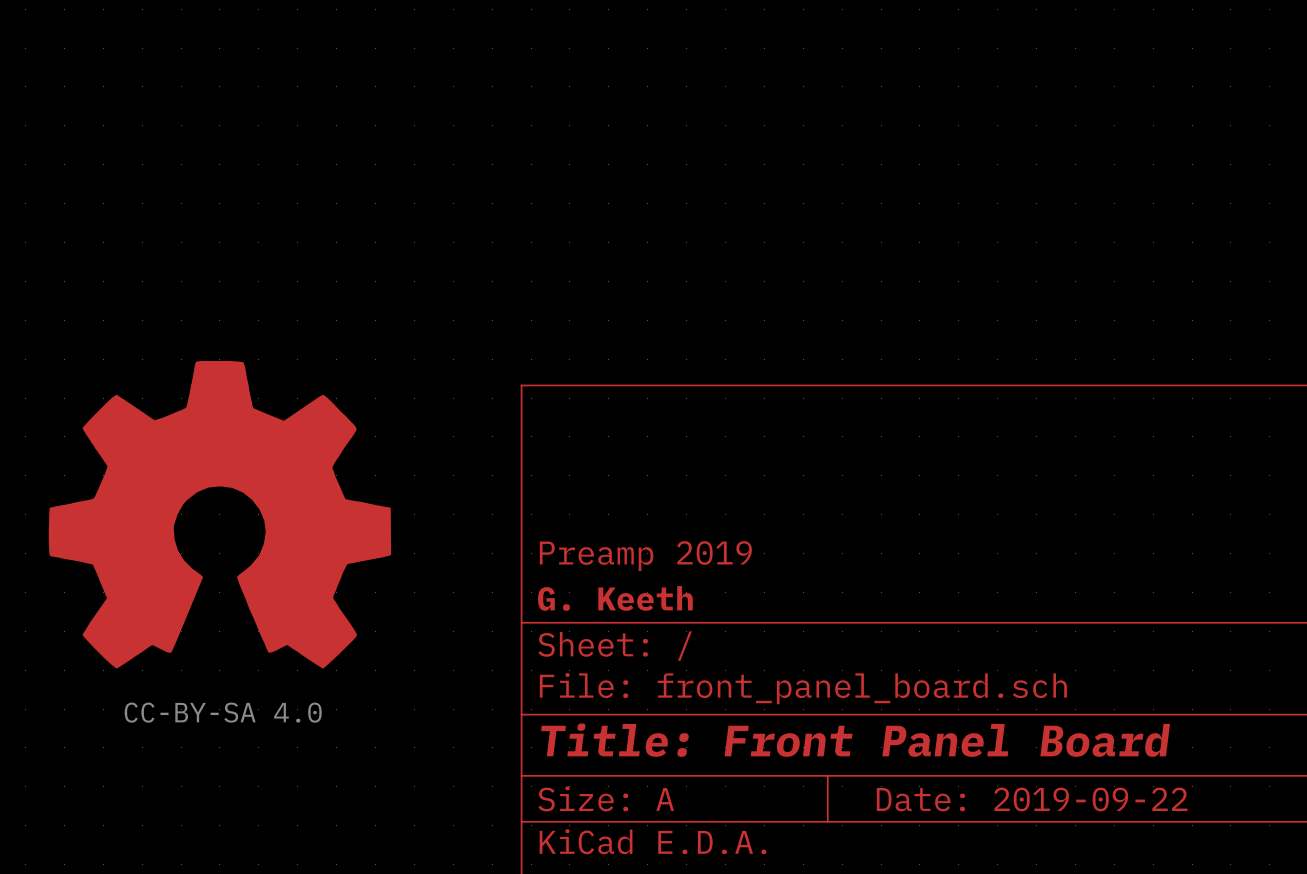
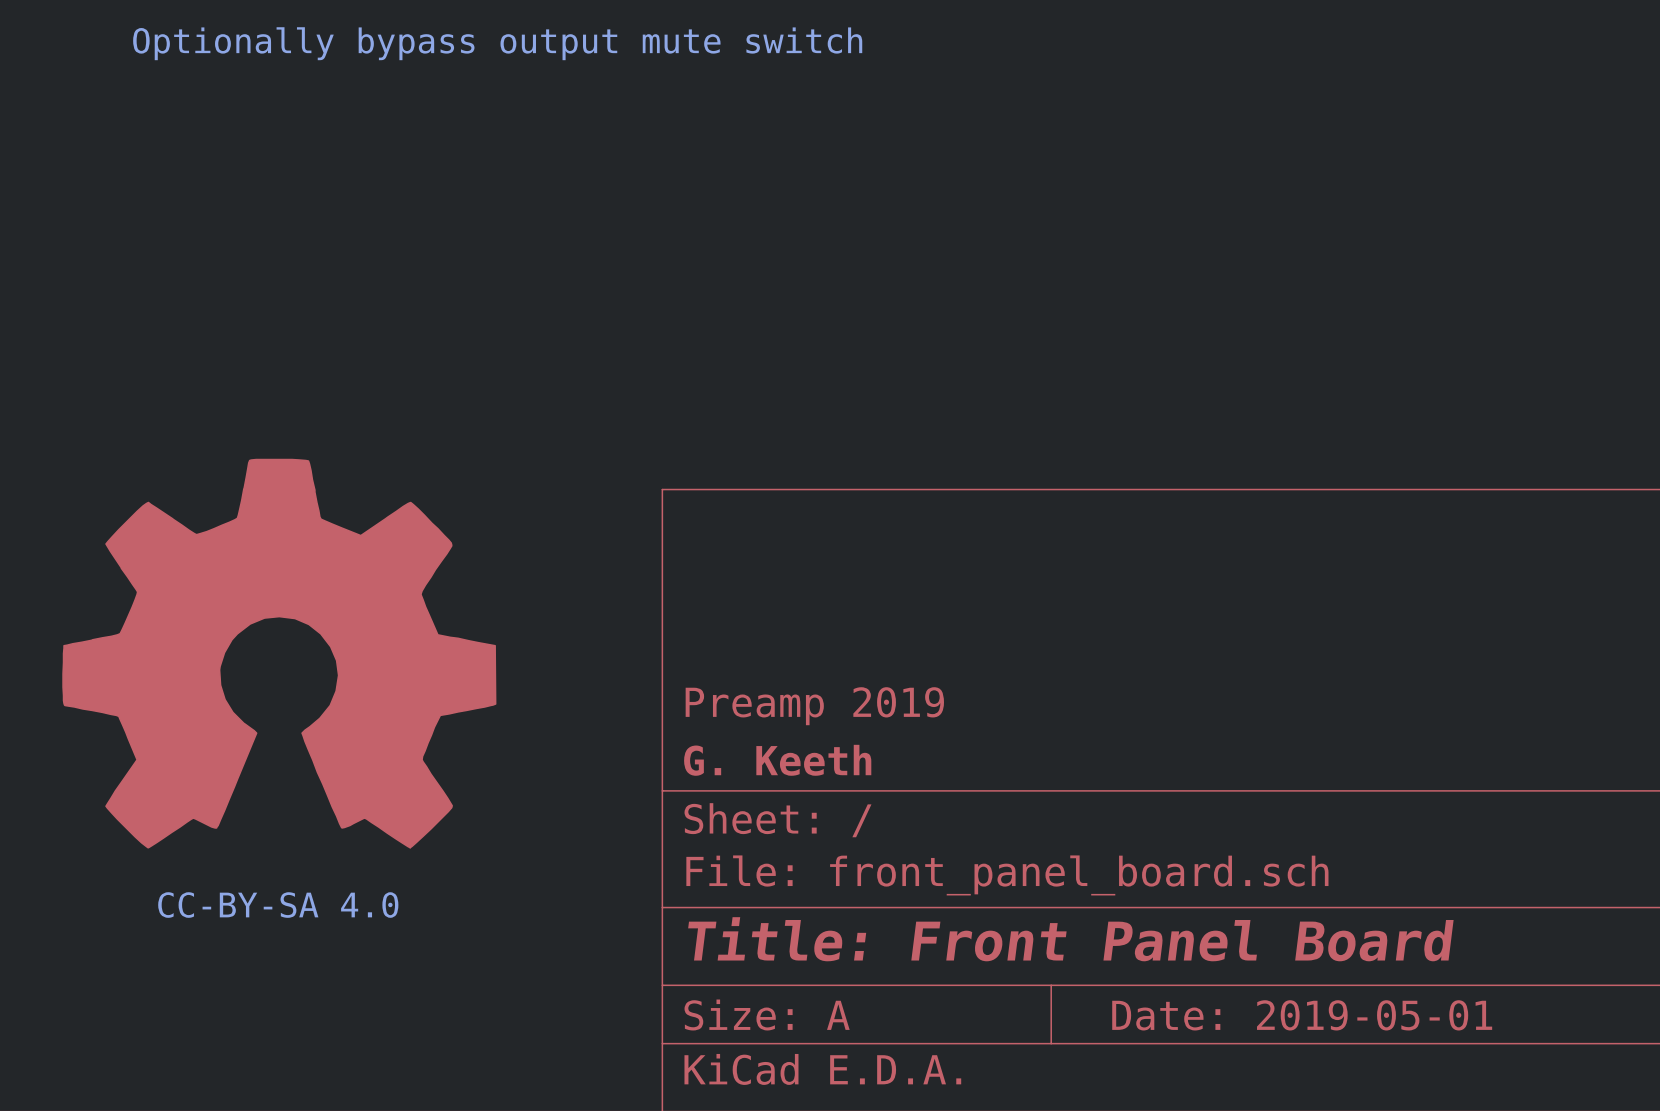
text: none -> Optionally bypass output mute switch (497, 43)
title block: Date: 2019-09-22 (1032, 799) -> Date: 2019-05-01 (1302, 1015)

